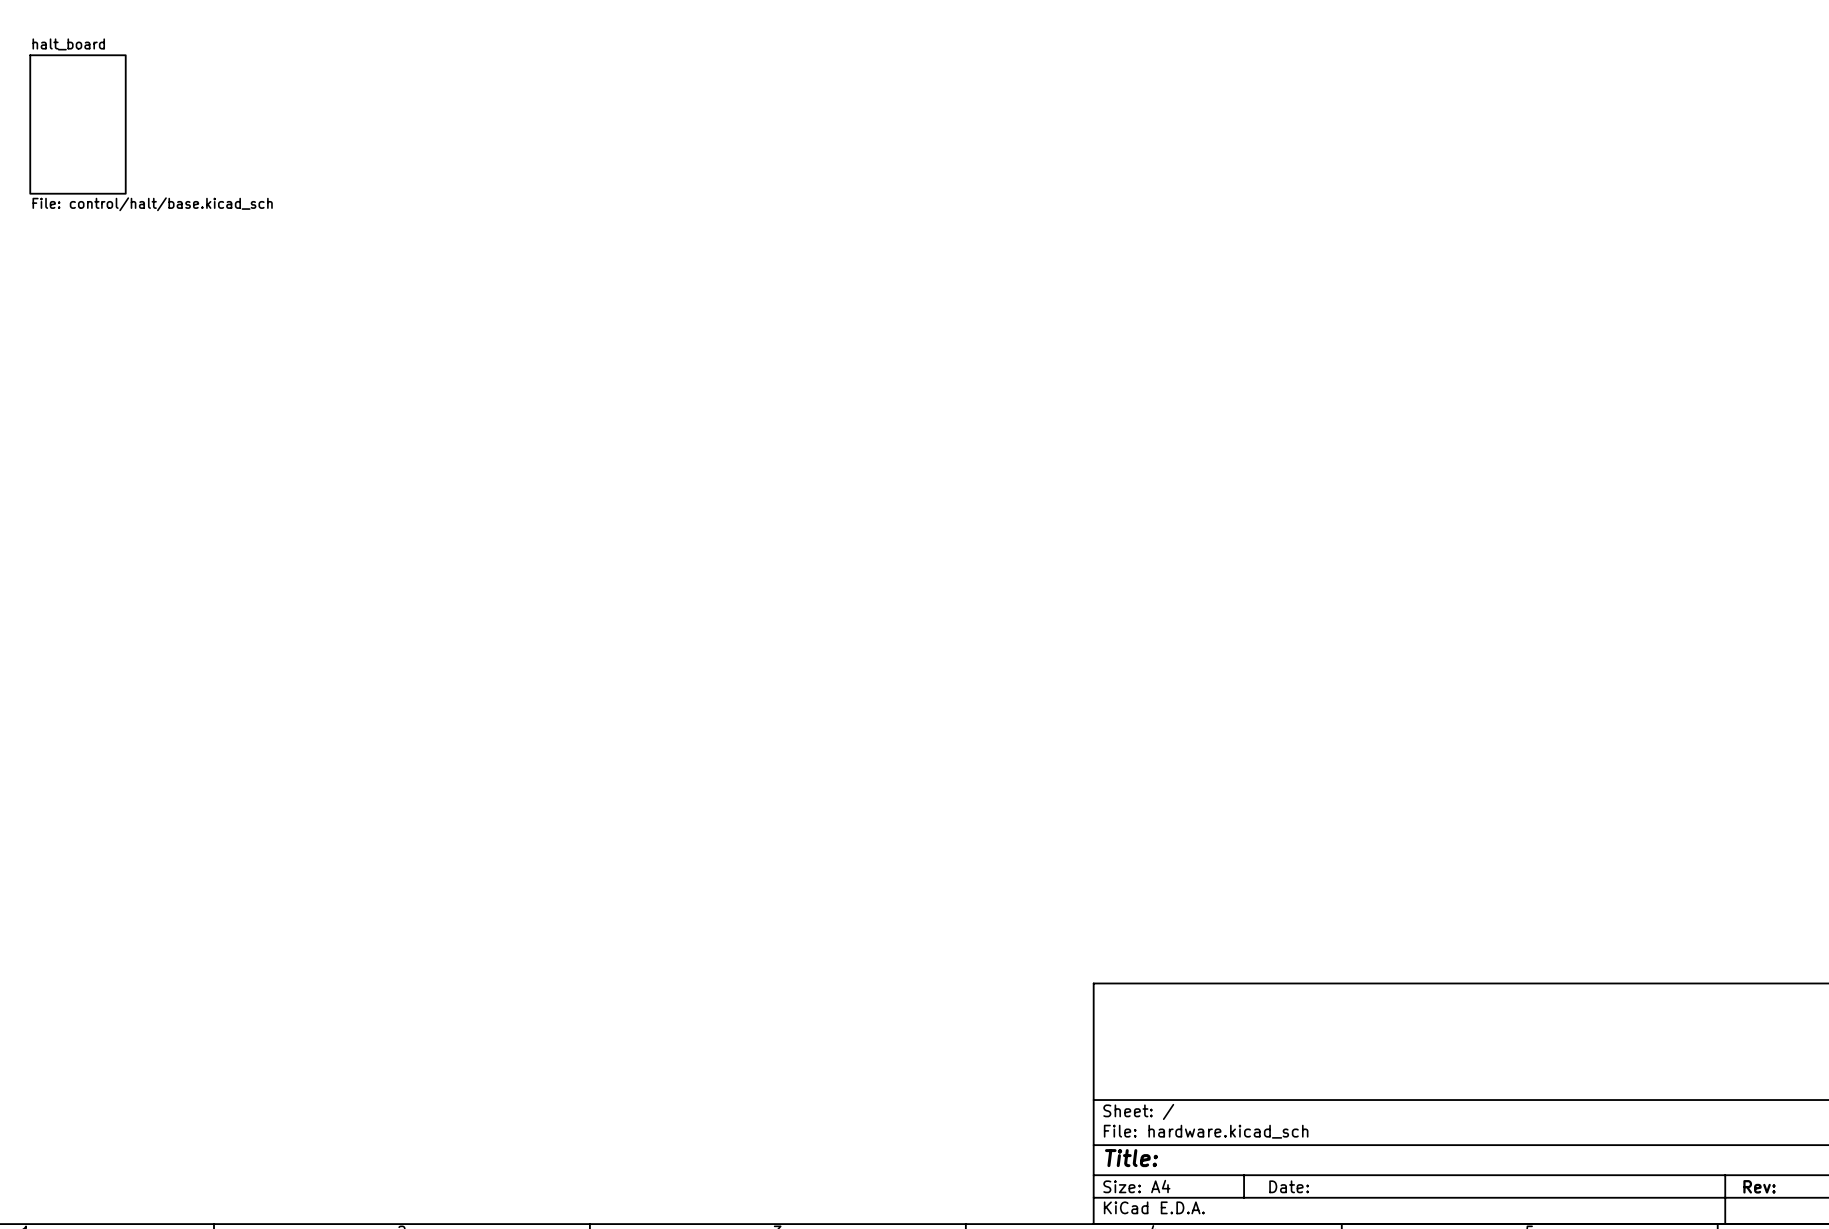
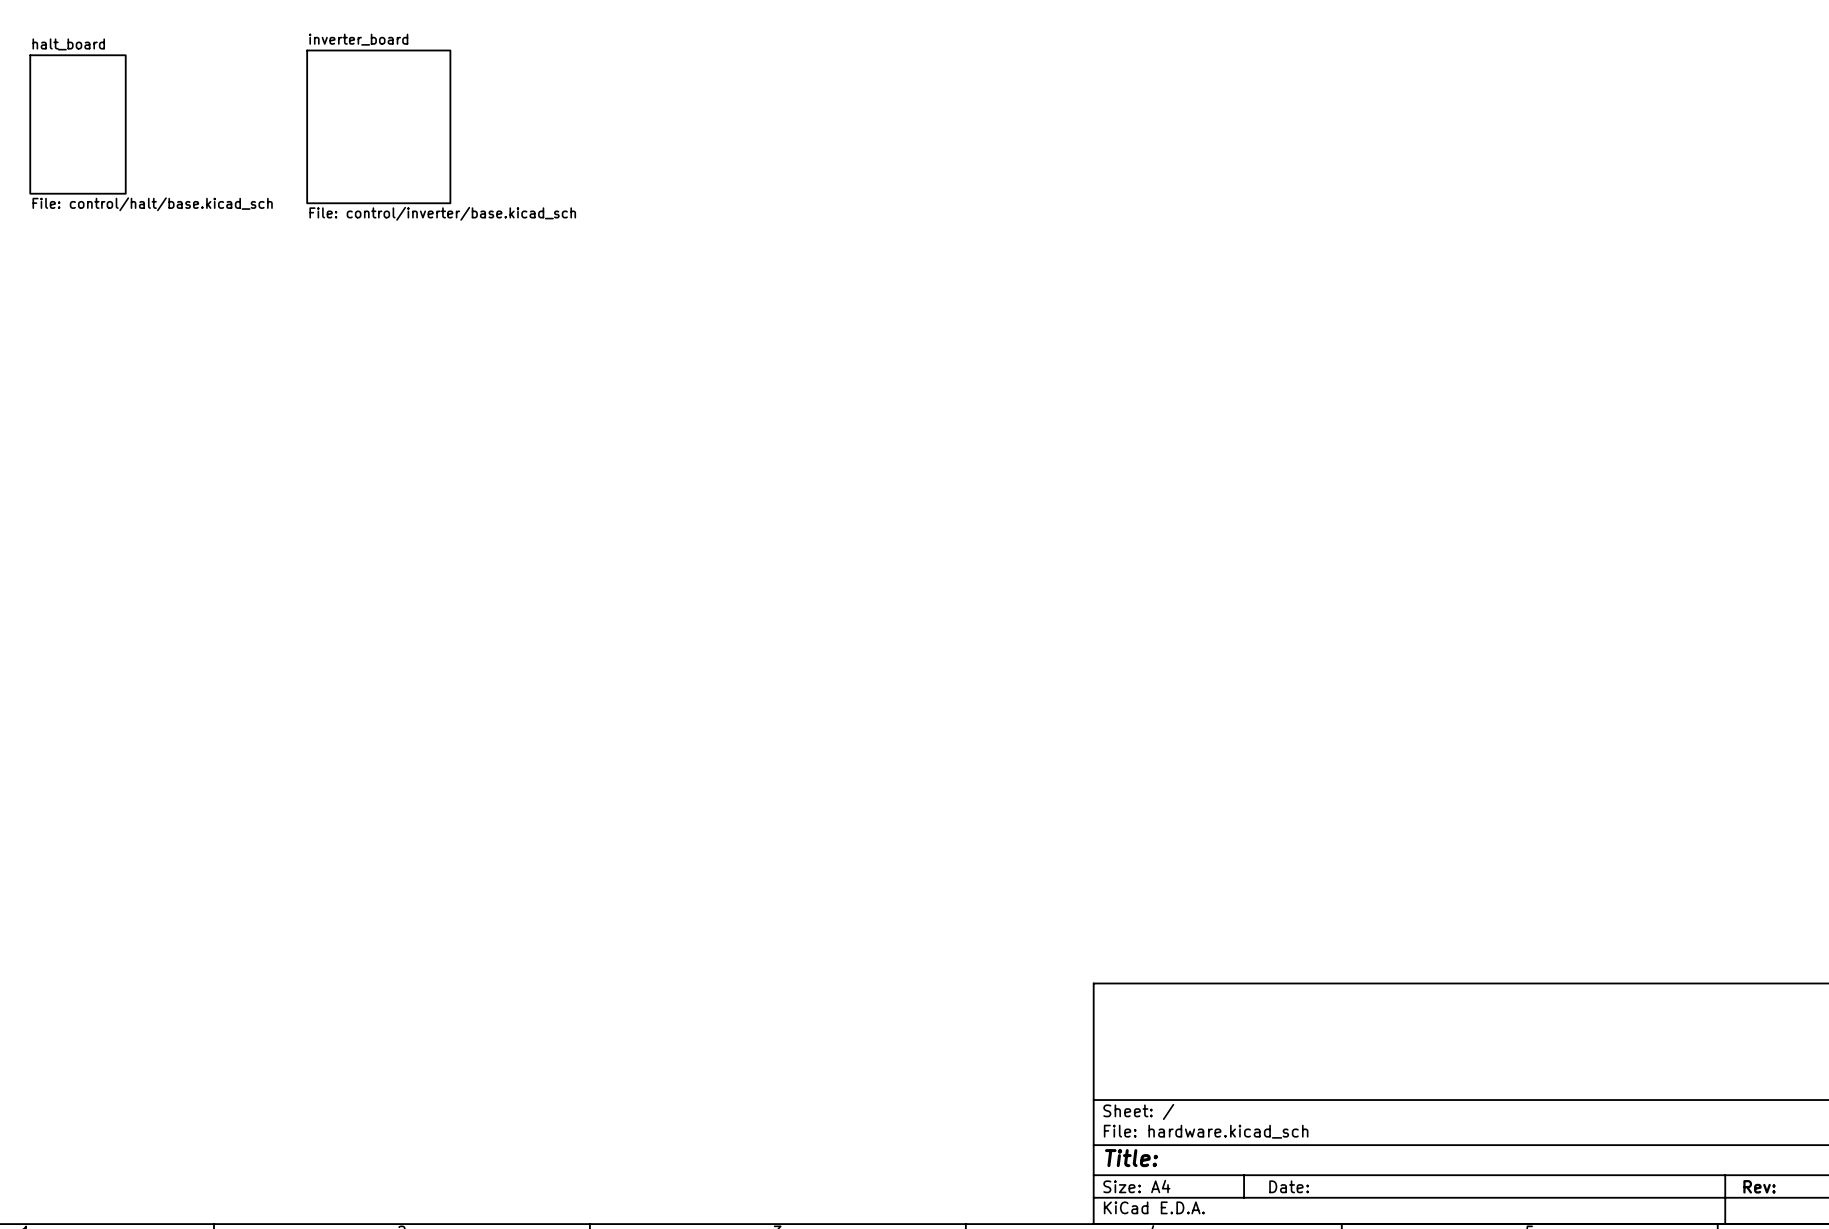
sheet inverter_board: none -> File: control/inverter/base.kicad_sch (378, 126)

